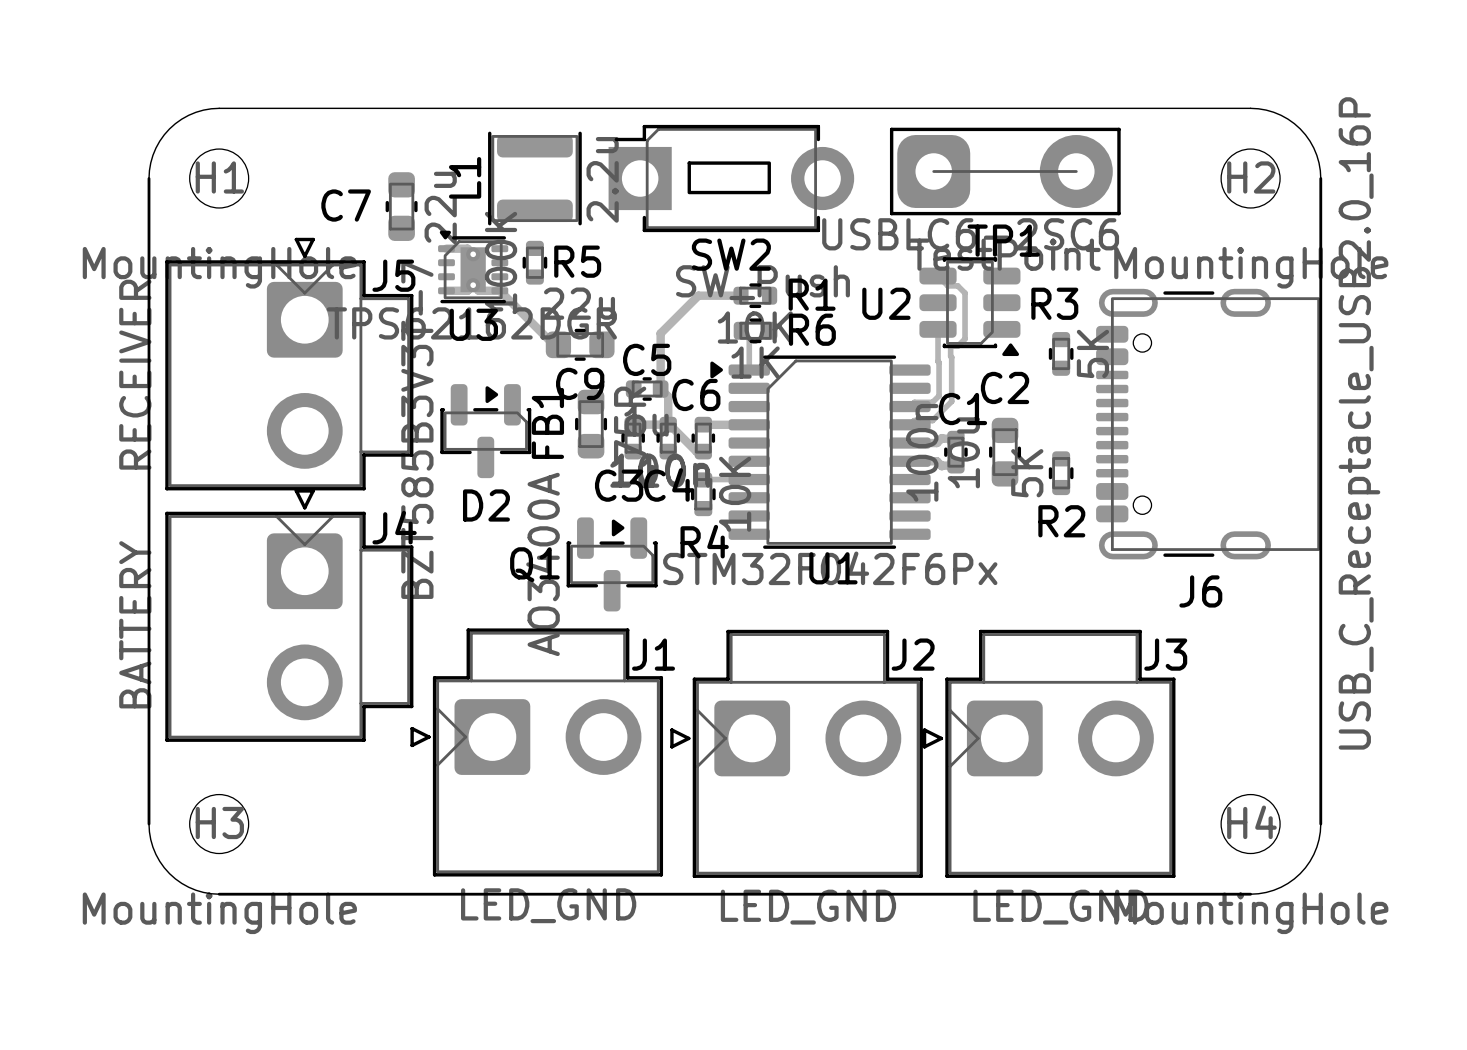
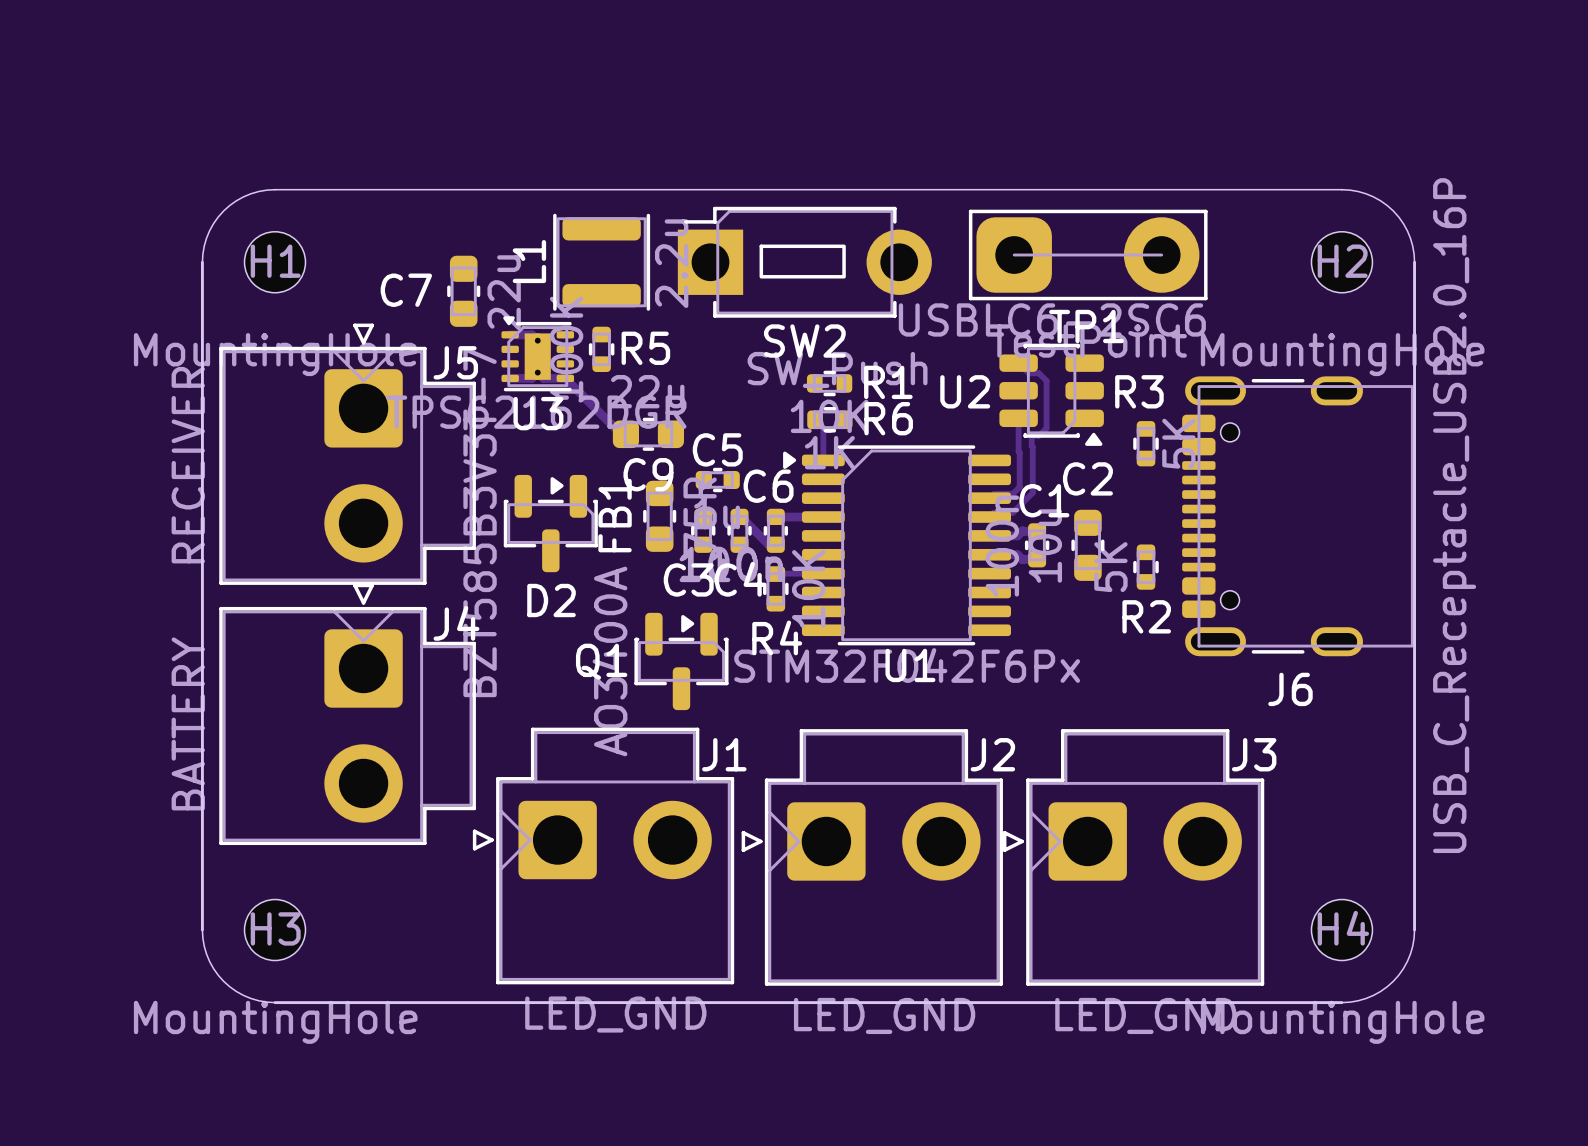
track: (740, 295) (698, 295) (660, 333) (660, 389) (668, 396) (668, 424) (633, 424) -> none

